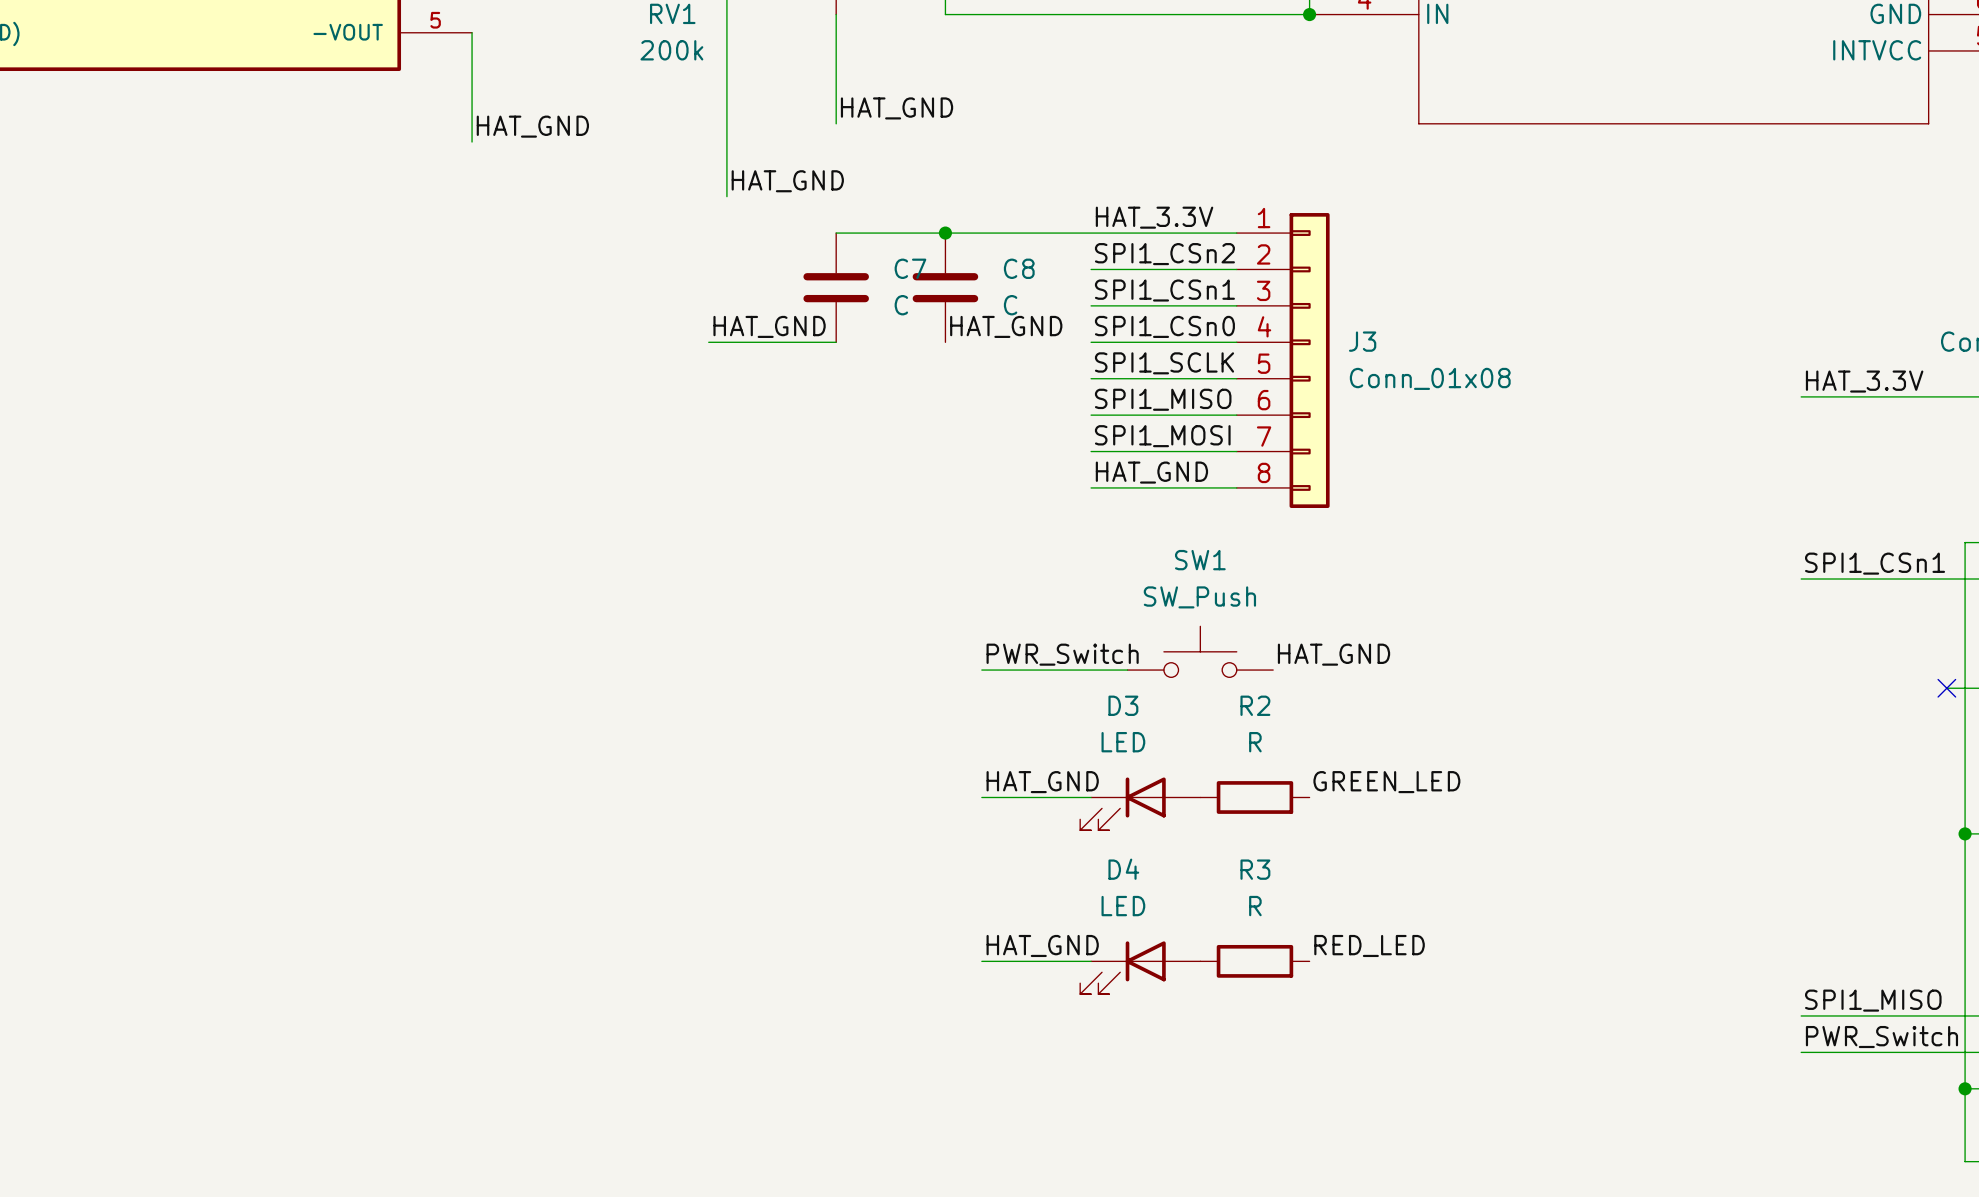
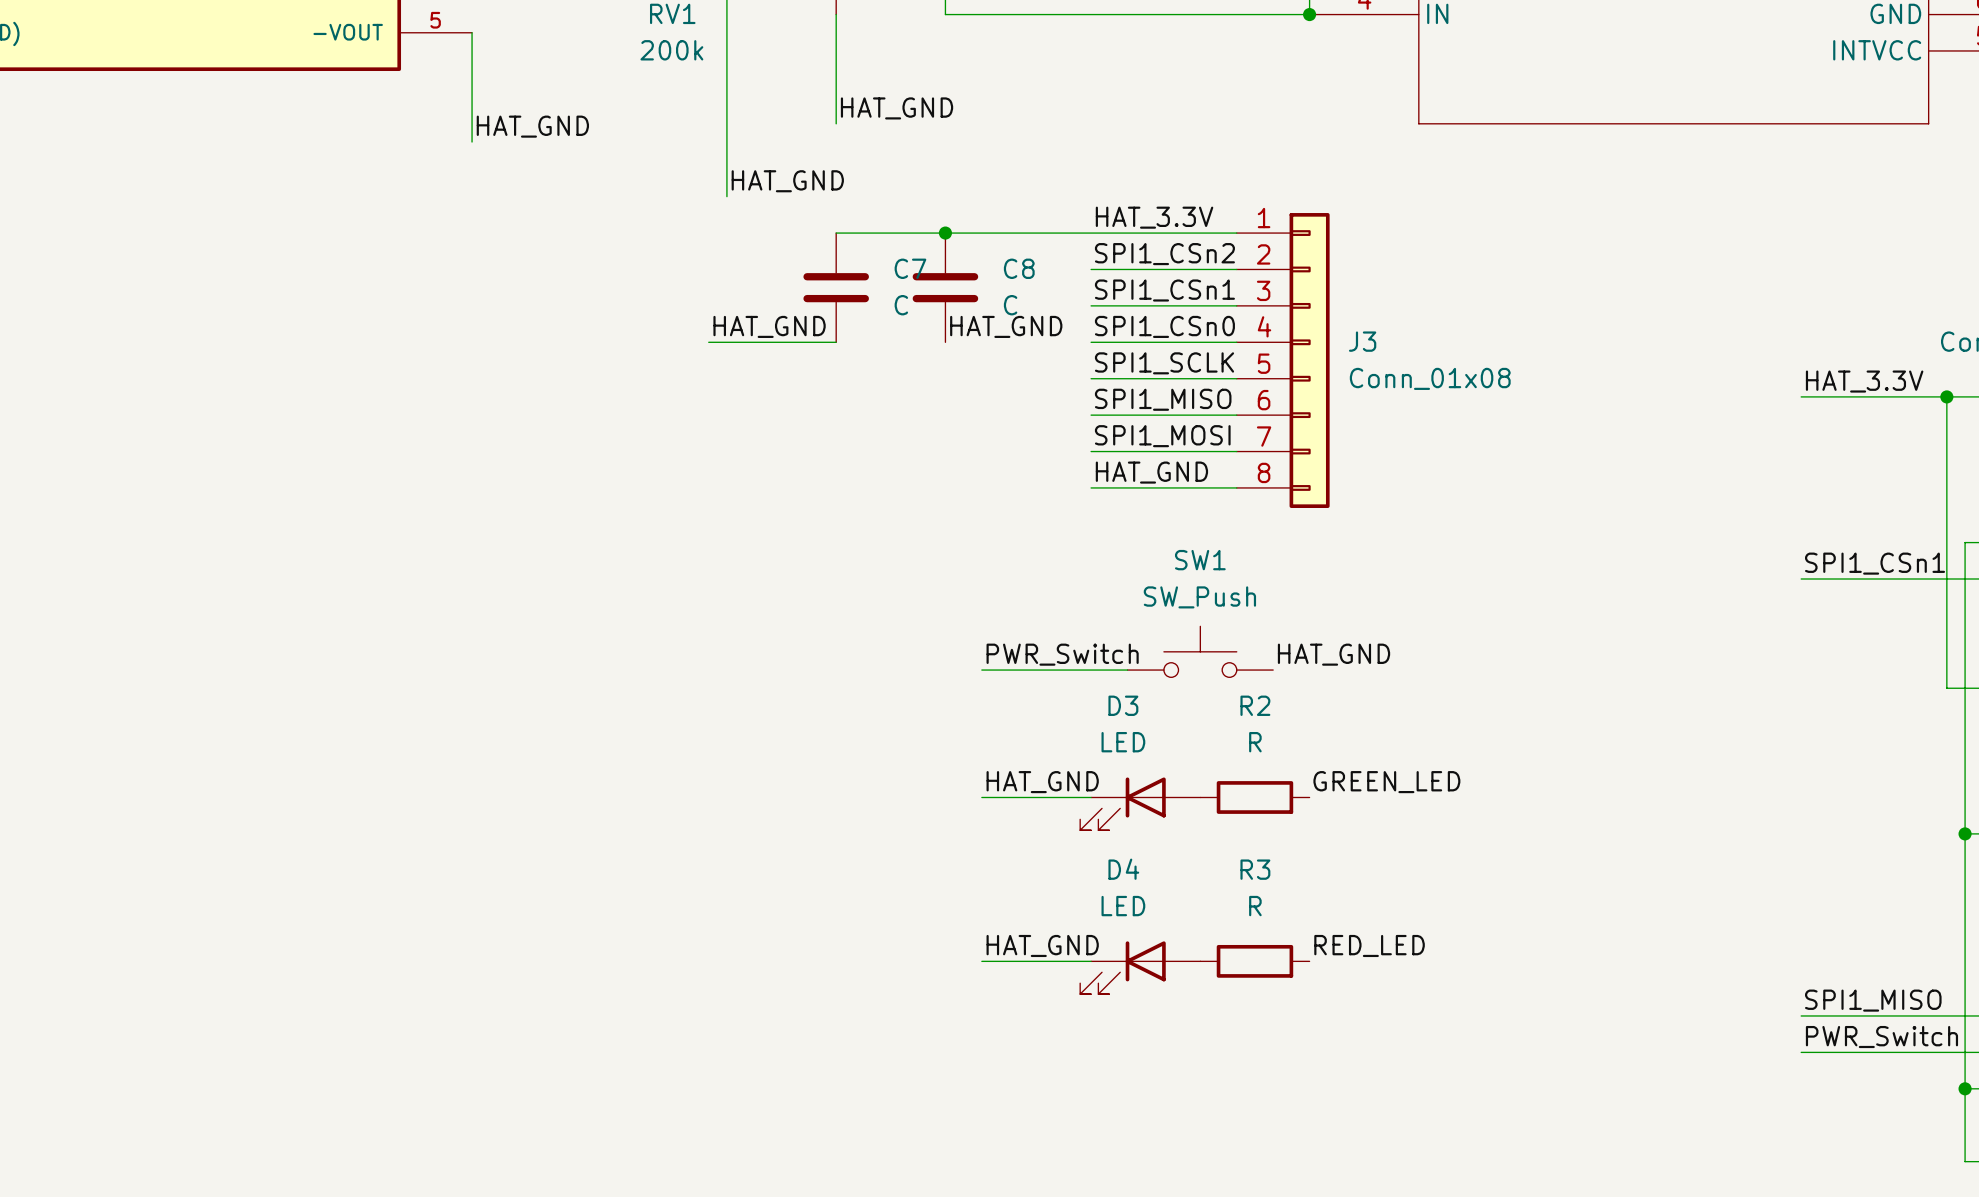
wire: none -> (1946, 396) (1946, 688)
junction: none -> (1946, 396)
no-connect mark: (1946, 688) -> none

